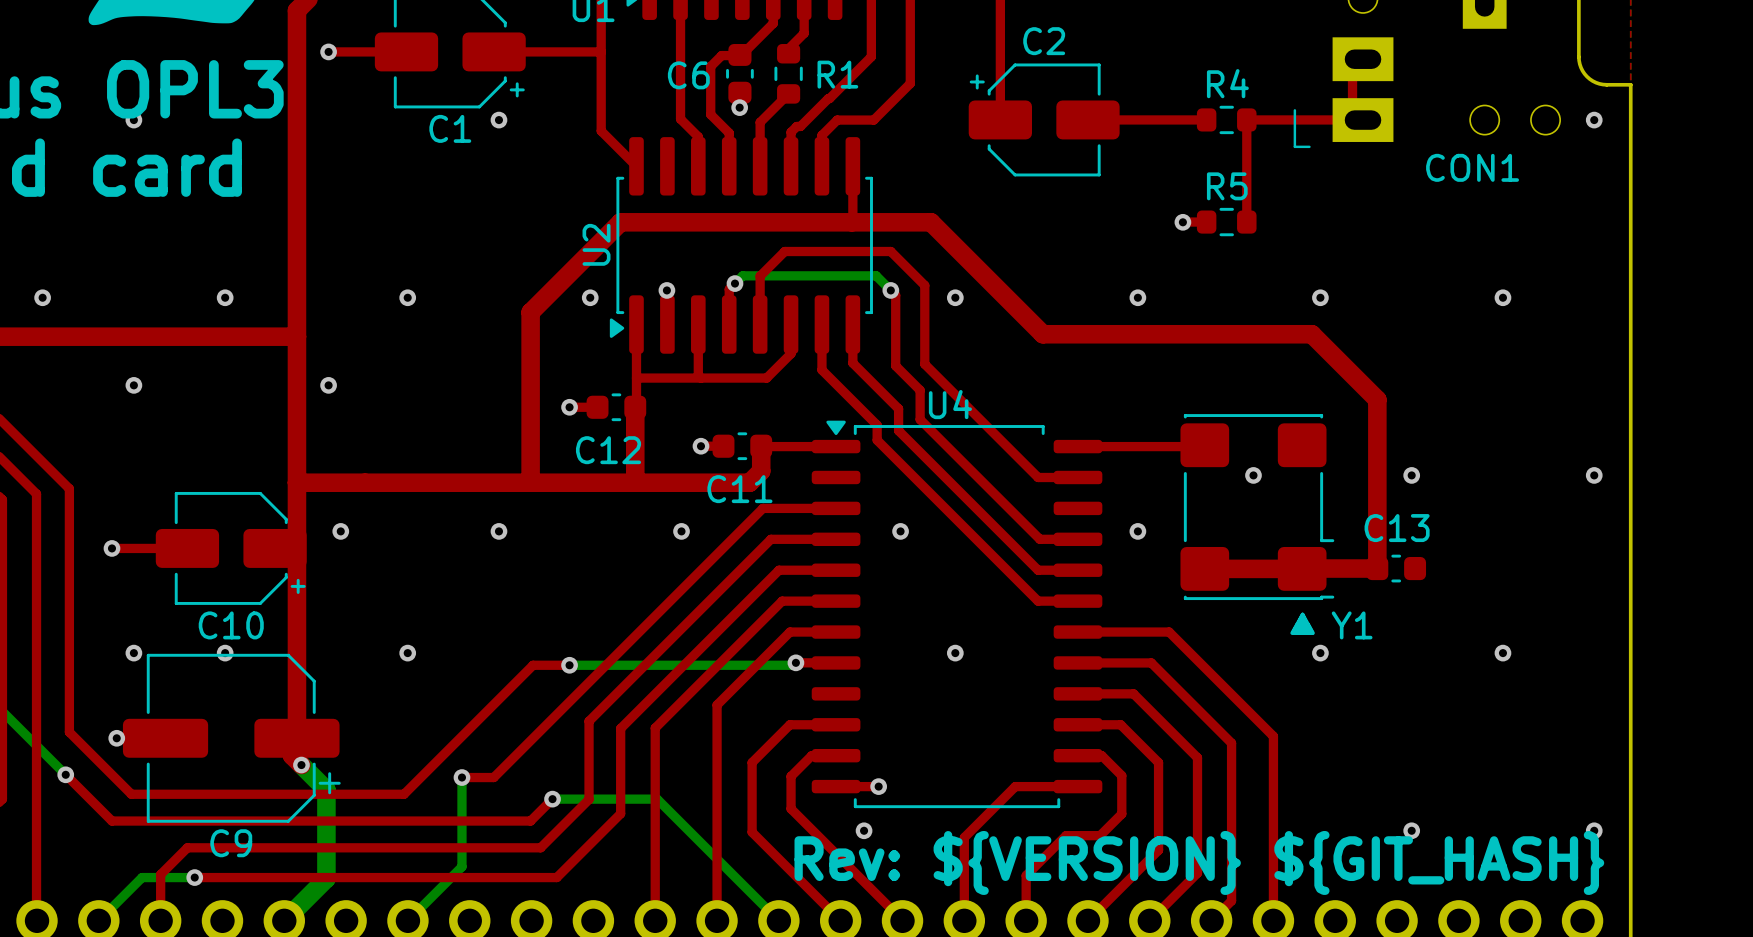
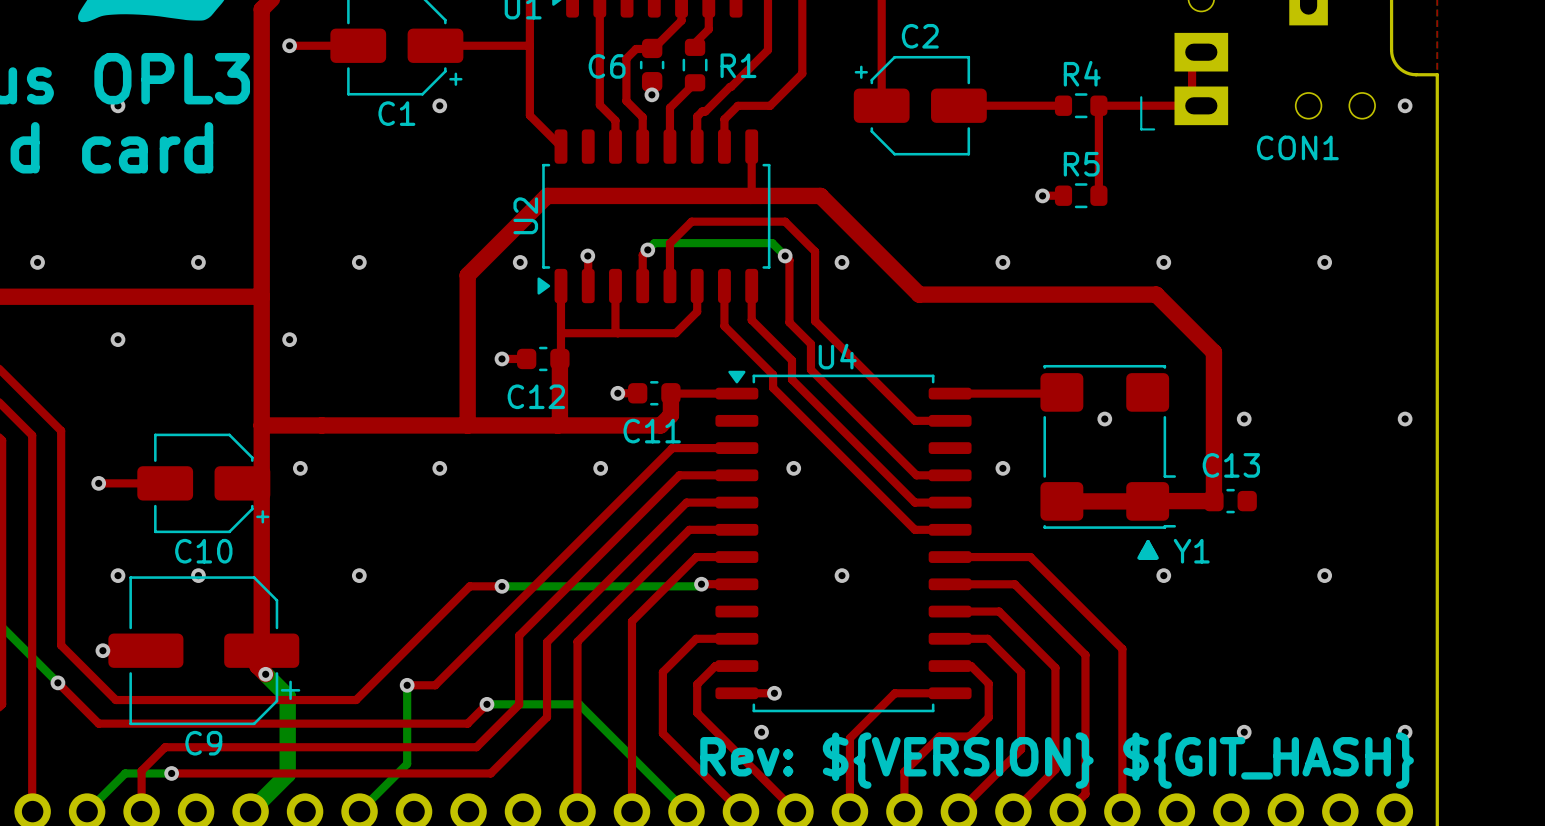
U2 footprint: [609, 137, 873, 354] -> [537, 129, 771, 304]
U4 footprint: [811, 420, 1103, 809] -> [715, 370, 972, 713]

